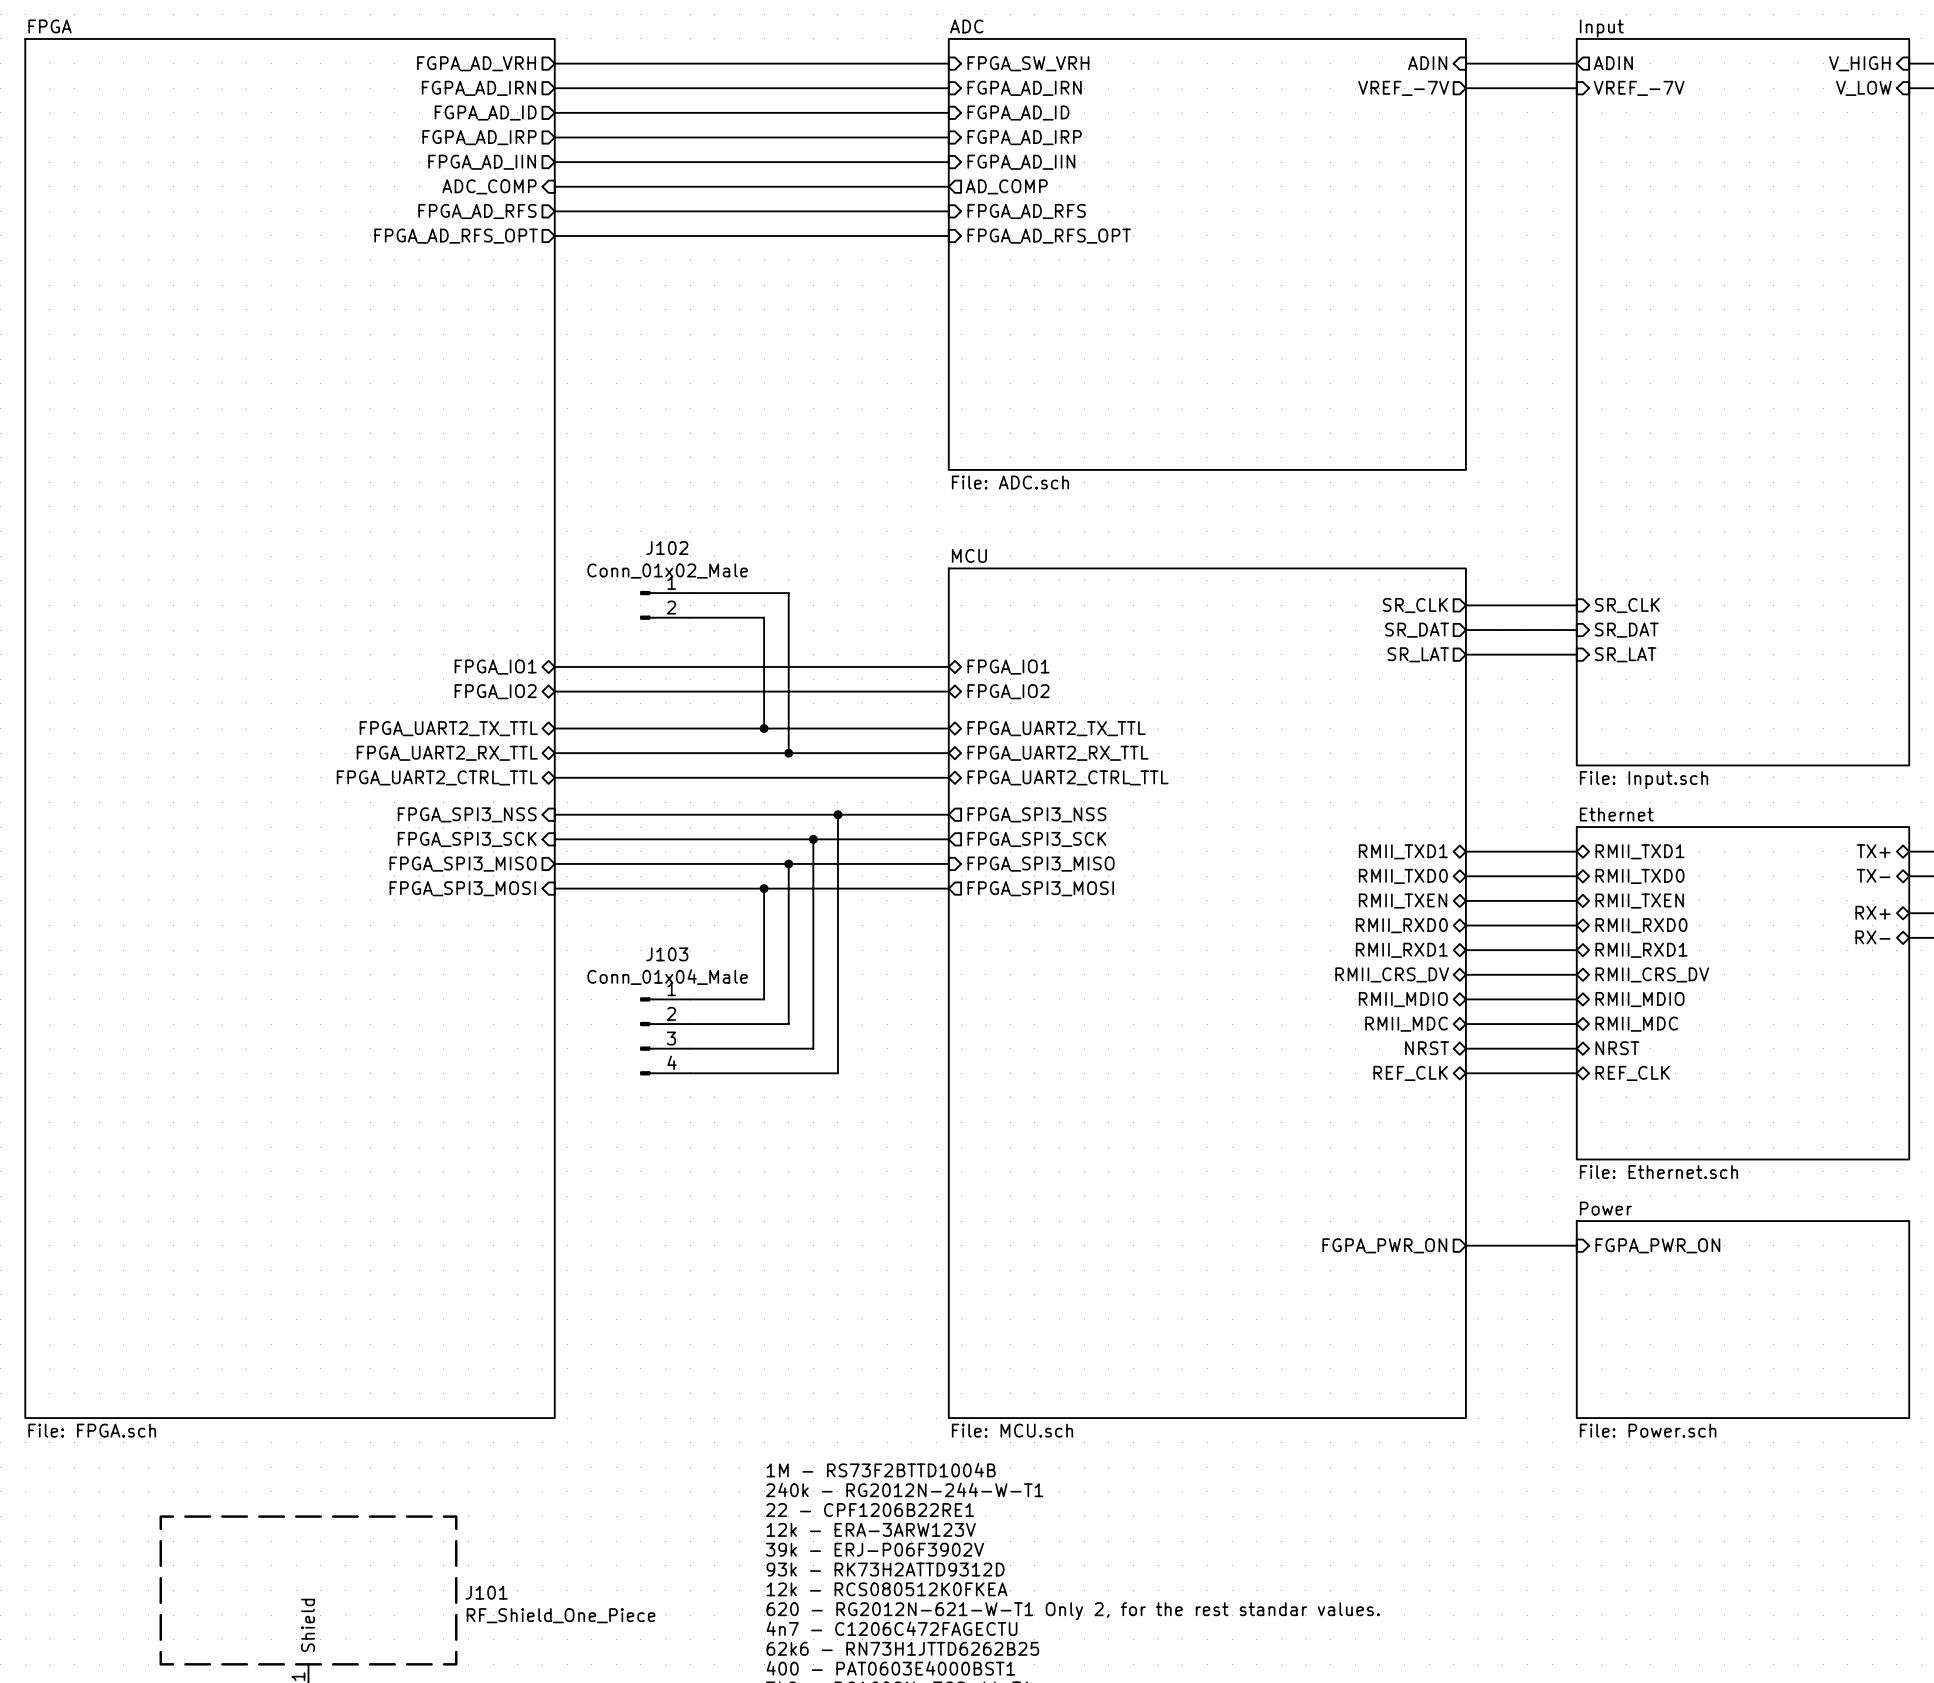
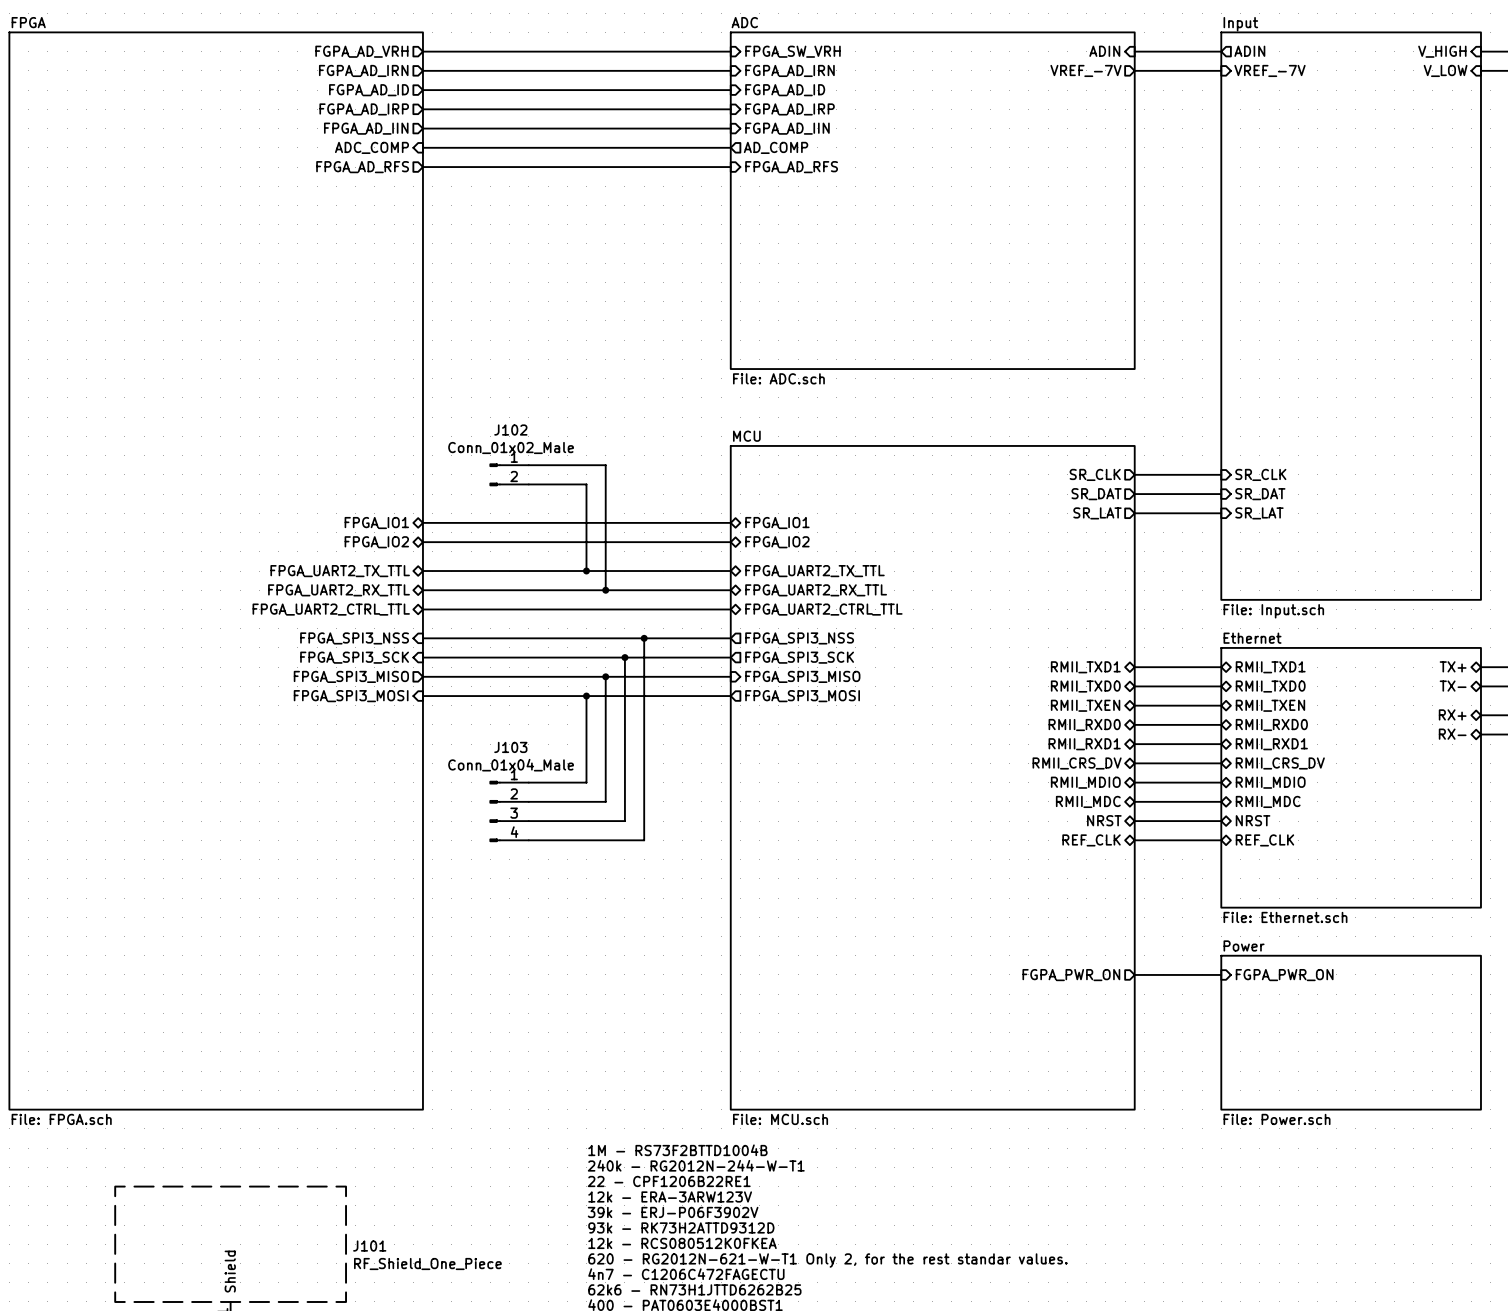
wire: (554, 235) (948, 235) -> none
sheet pin: FPGA_AD_RFS_OPT (456, 236) -> none
sheet pin: FPGA_AD_RFS_OPT (1049, 236) -> none

